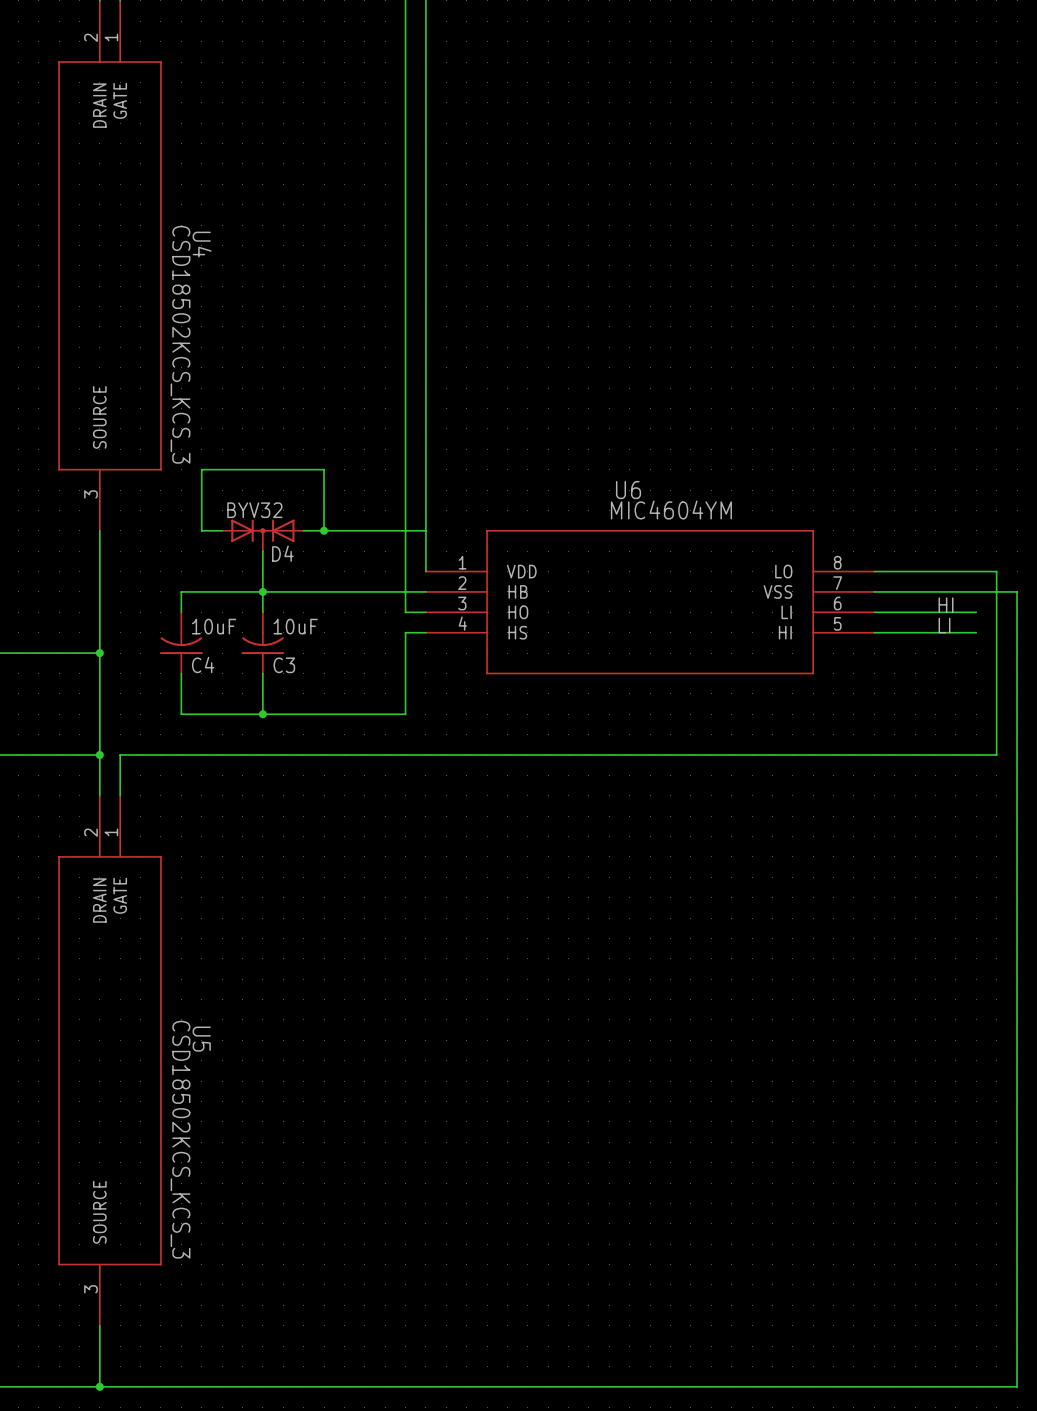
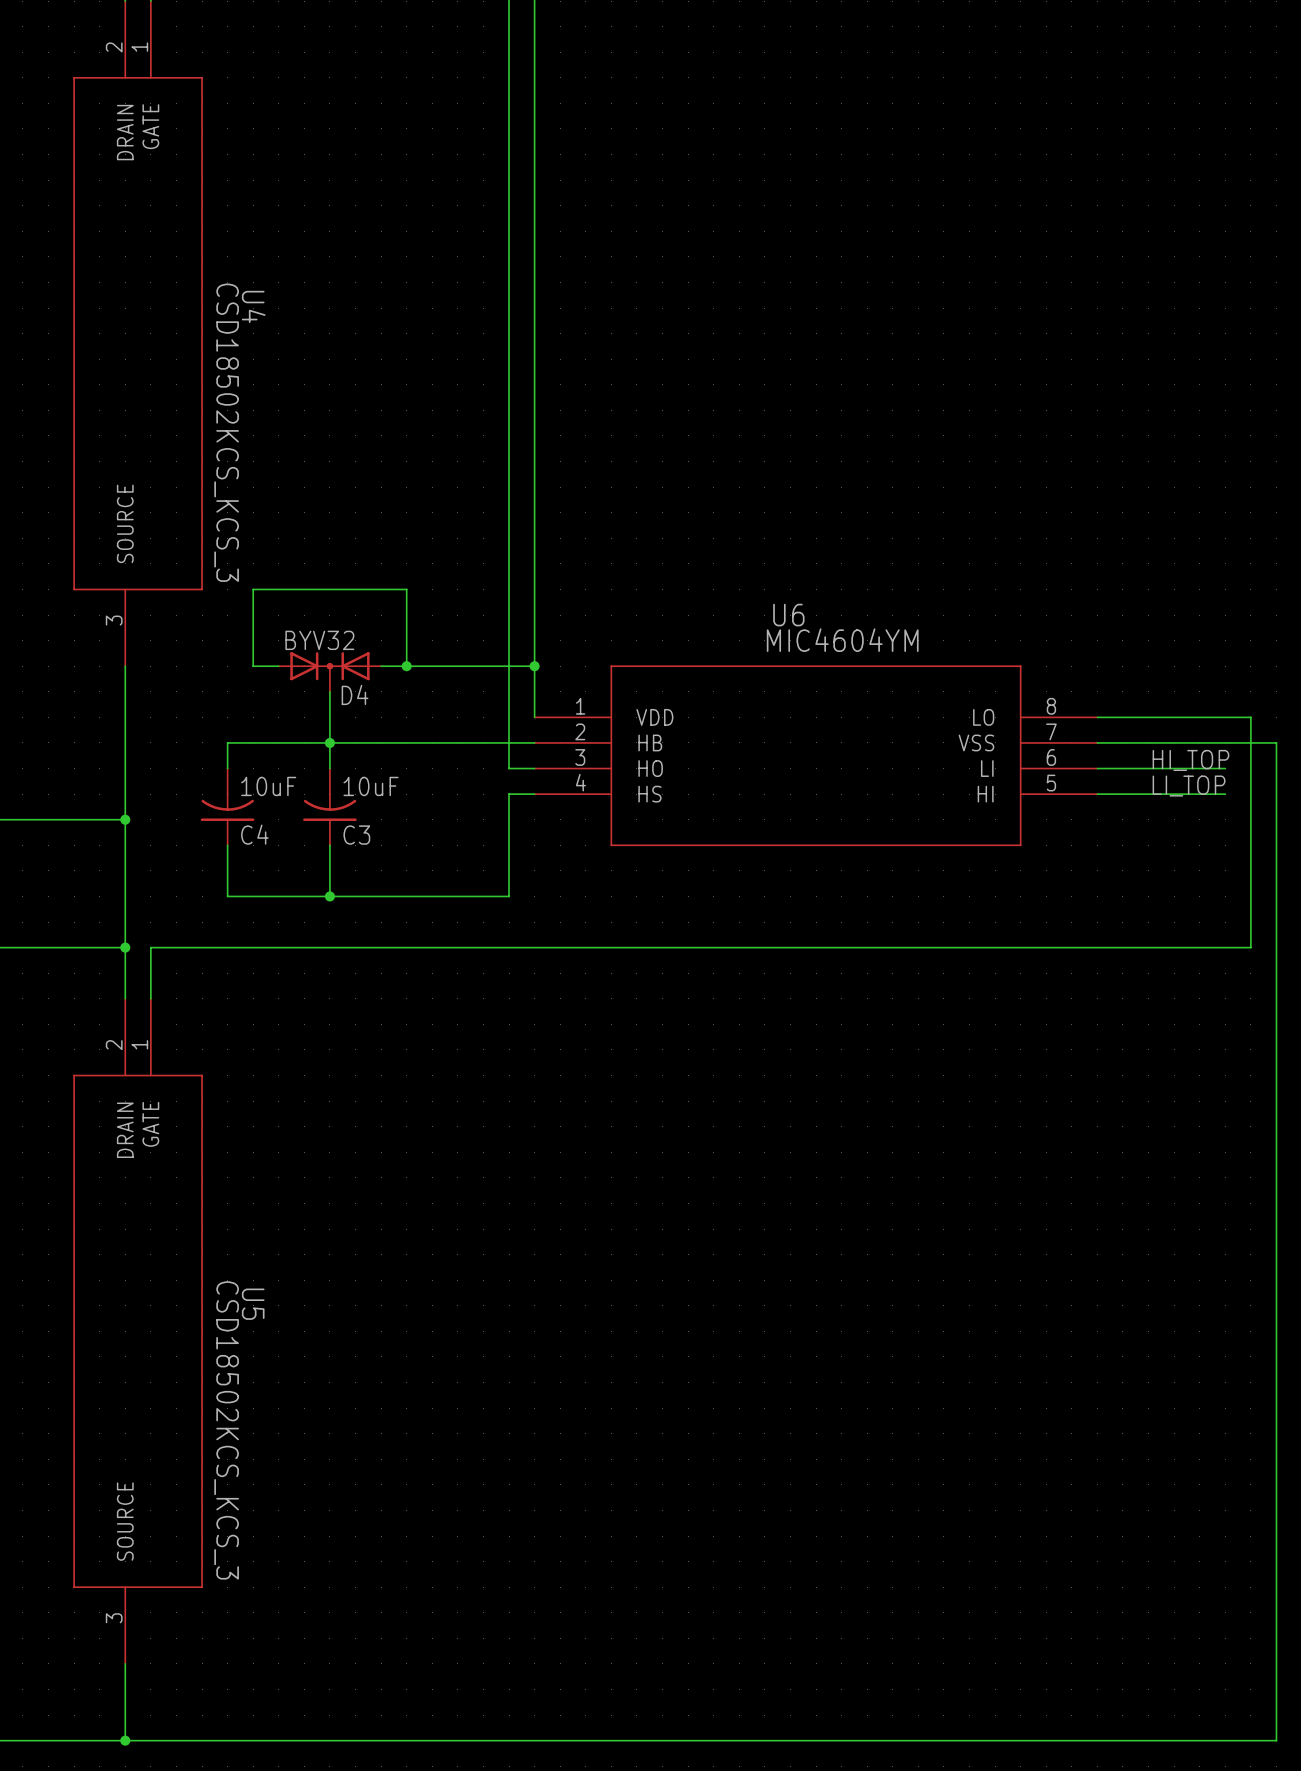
junction: none -> (534, 666)
label: HI (946, 605) -> none
label: none -> HI_TOP (1190, 760)
label: LI (944, 625) -> none
label: none -> LI_TOP (1189, 786)

